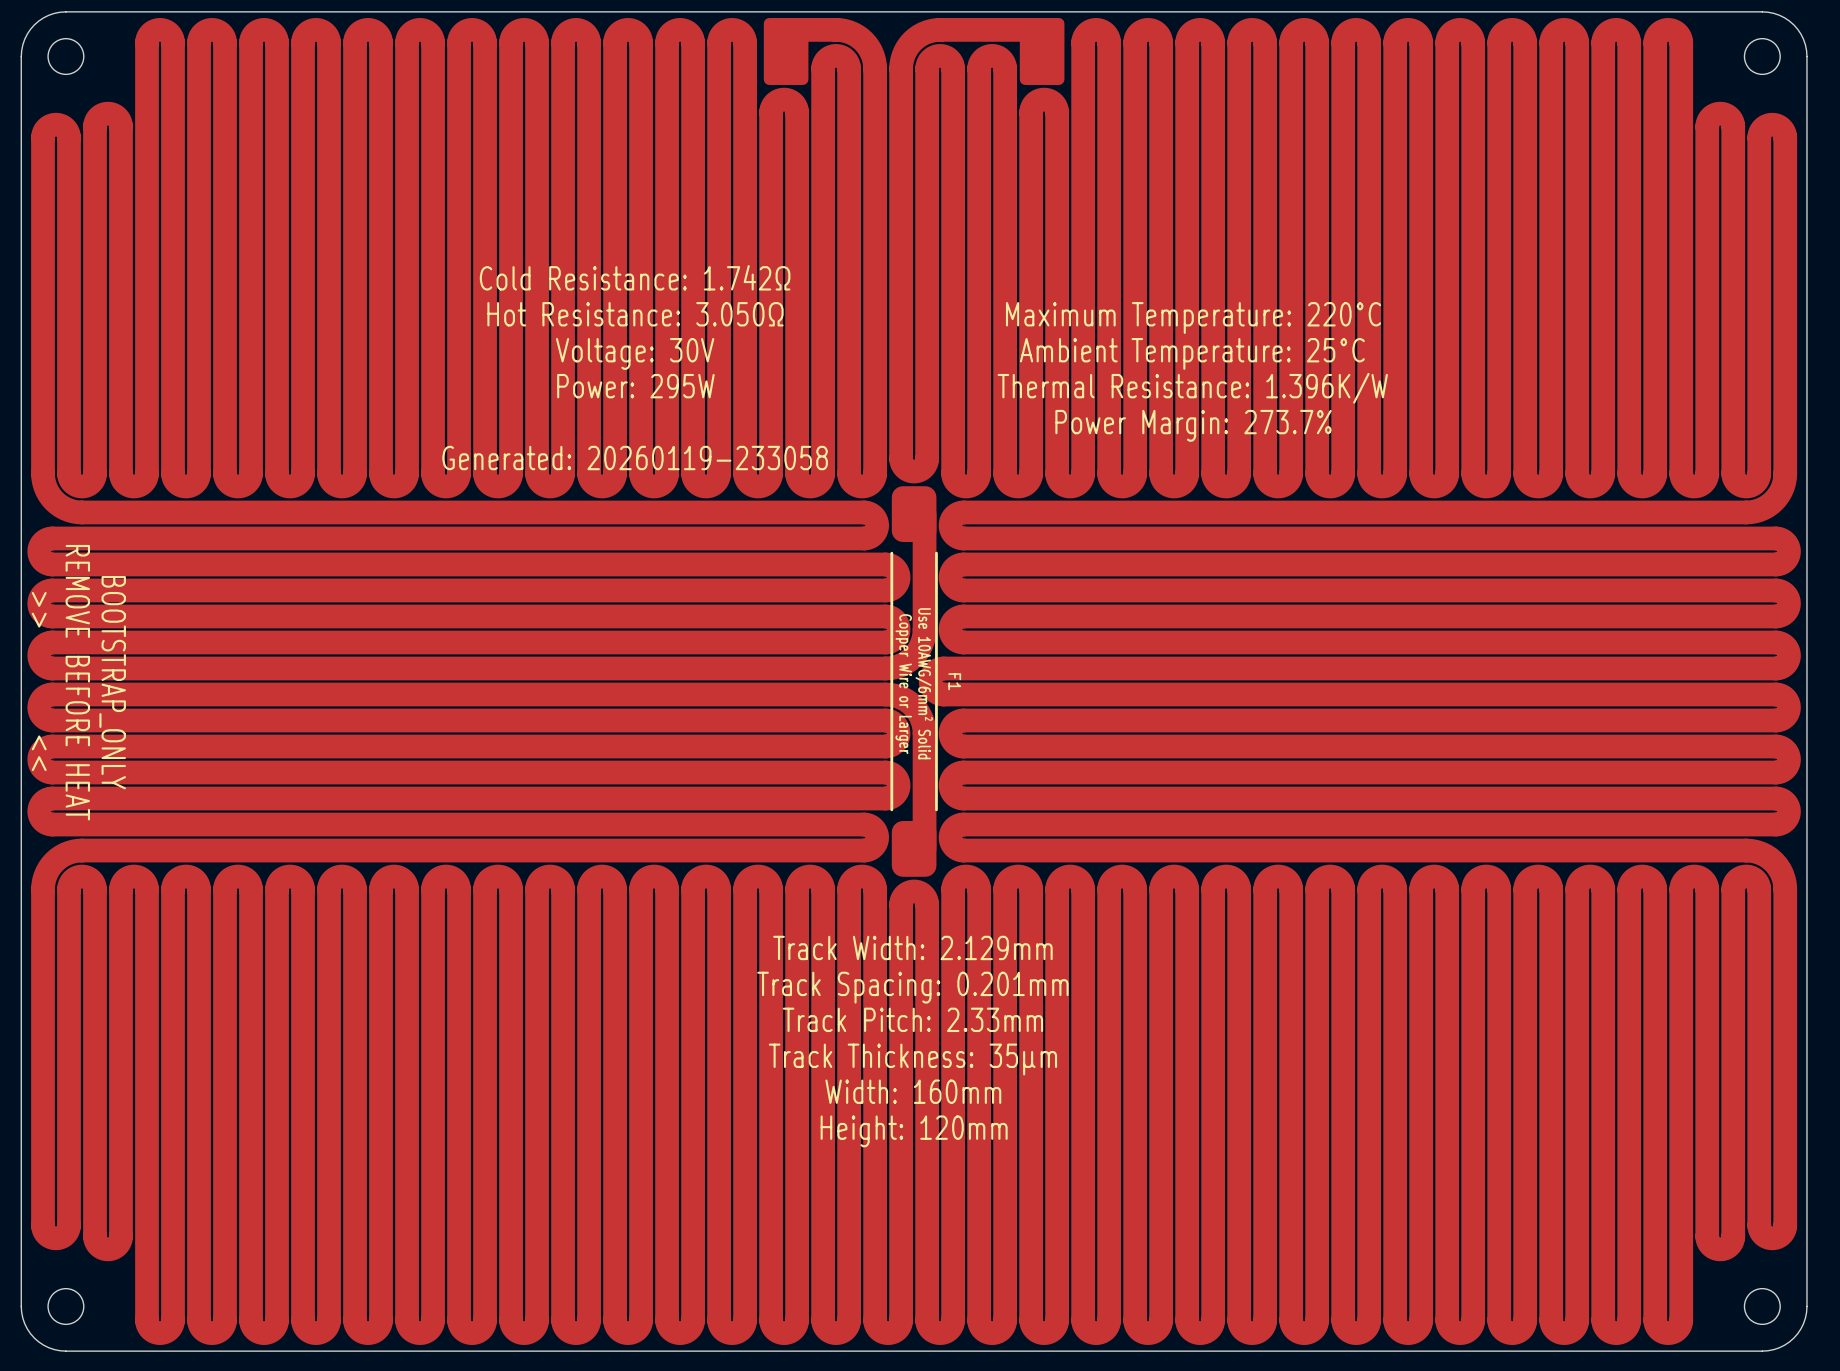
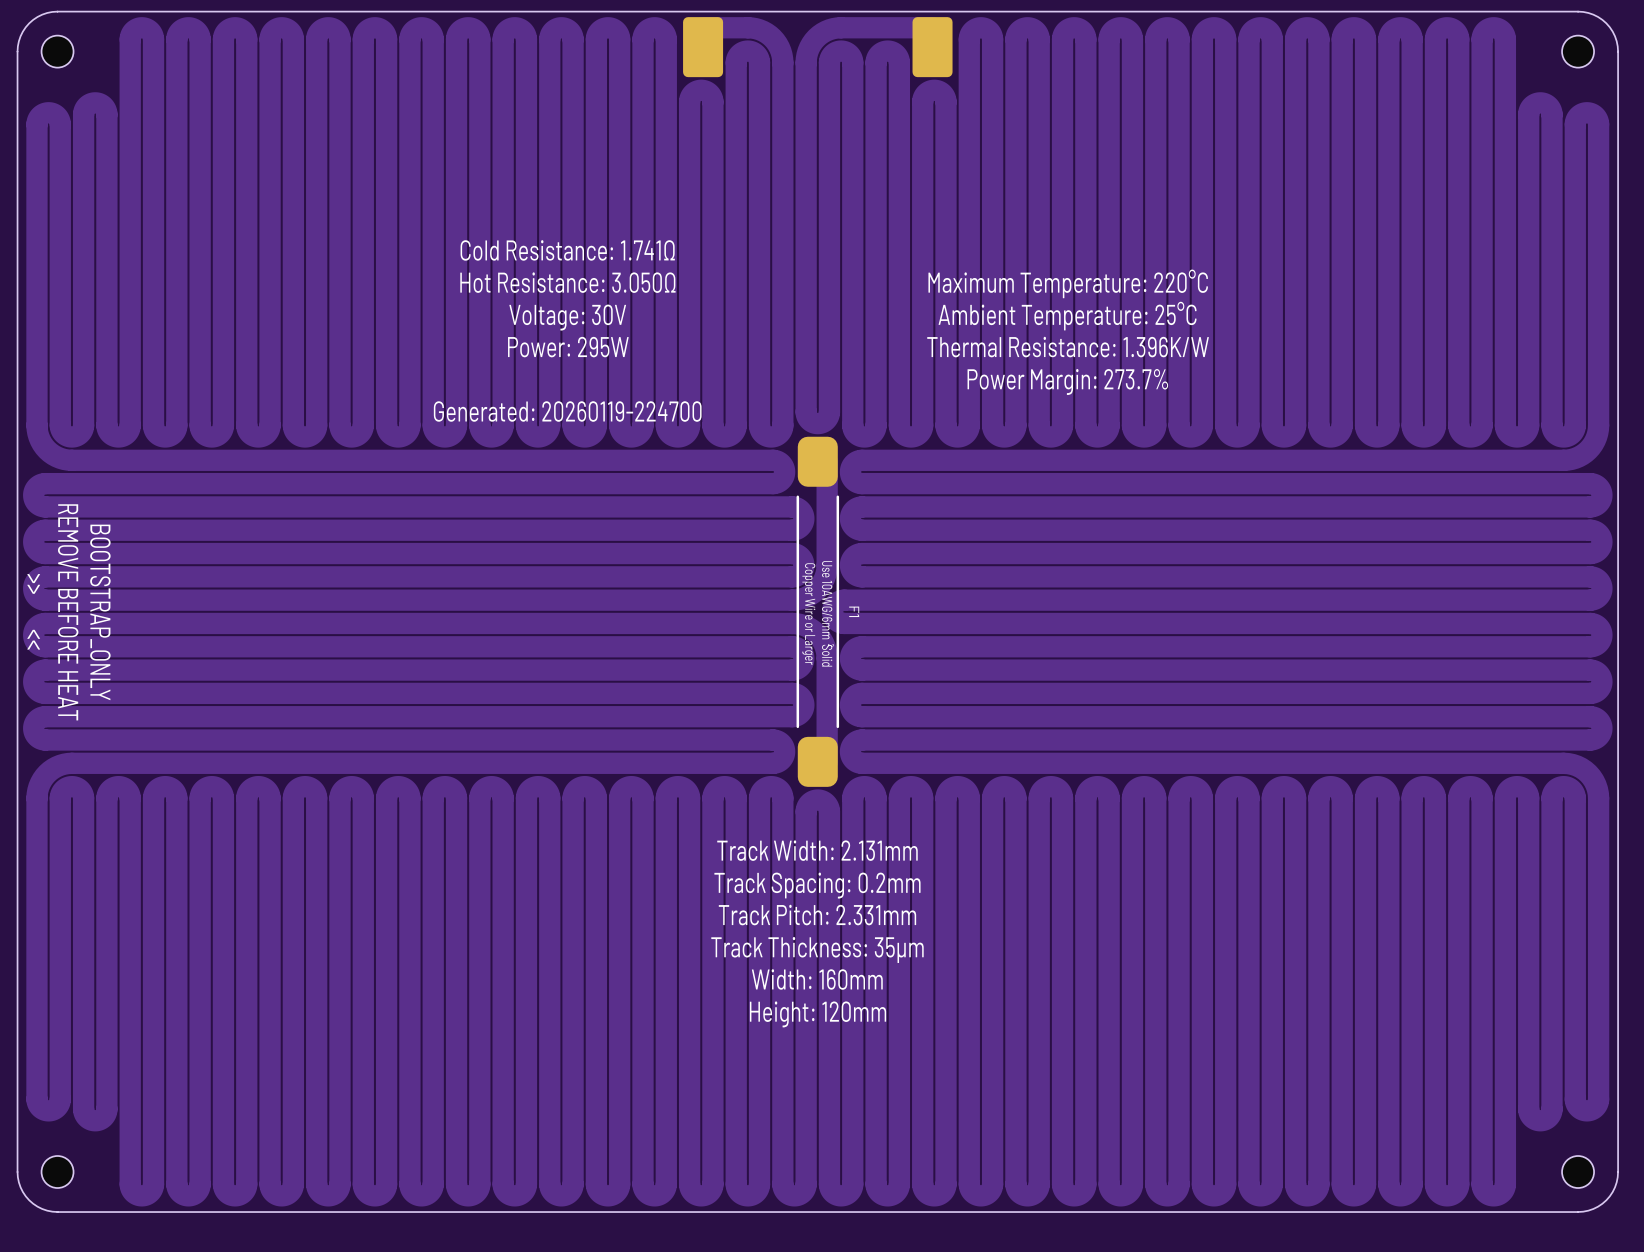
text: Cold Resistance: 1.742Ω (635, 277) -> Cold Resistance: 1.741Ω (567, 250)
text: Generated: 20260119-233058 (635, 458) -> Generated: 20260119-224700 (567, 411)
text: Track Width: 2.129mm (912, 947) -> Track Width: 2.131mm (817, 850)
text: Track Spacing: 0.201mm (912, 987) -> Track Spacing: 0.2mm (817, 885)
text: Track Pitch: 2.33mm (912, 1019) -> Track Pitch: 2.331mm (817, 915)

